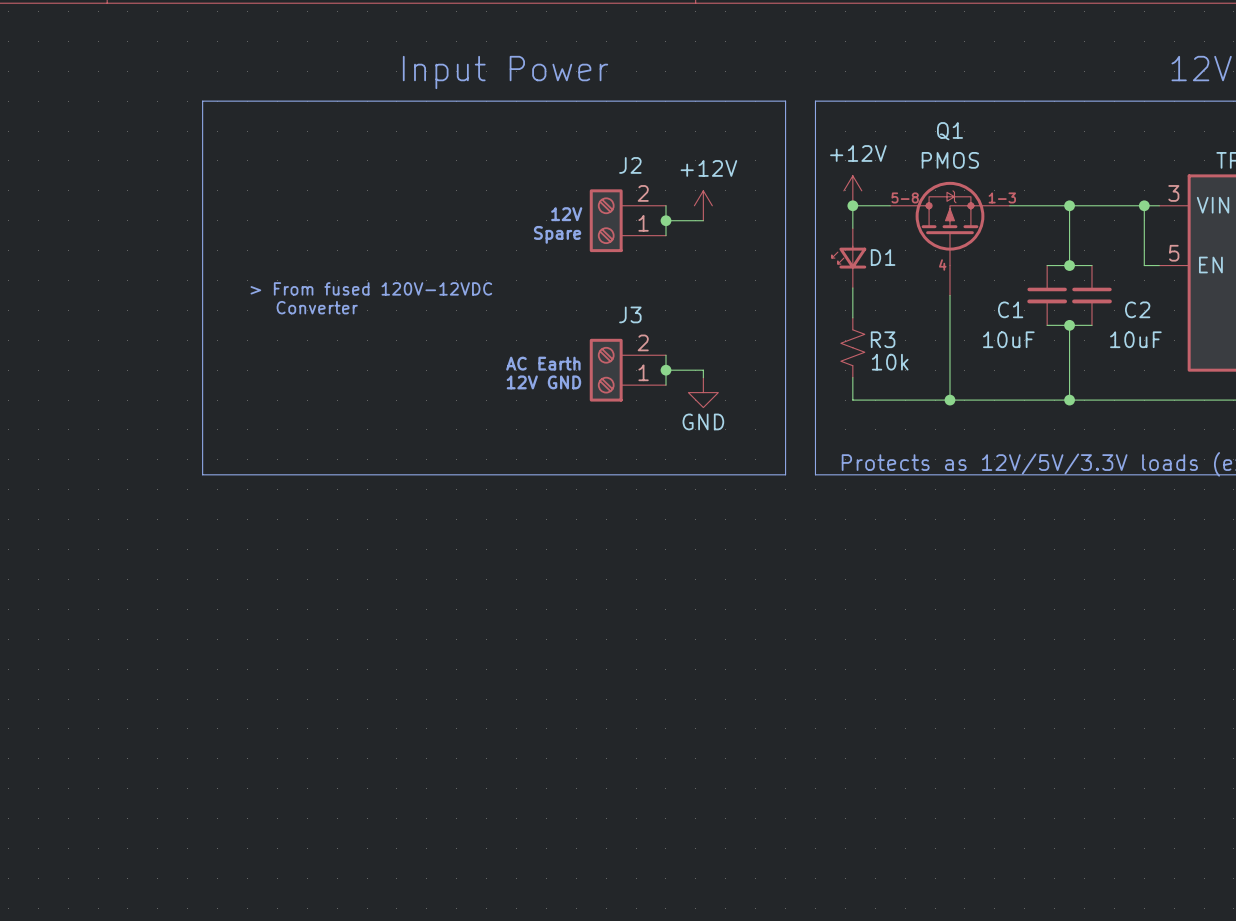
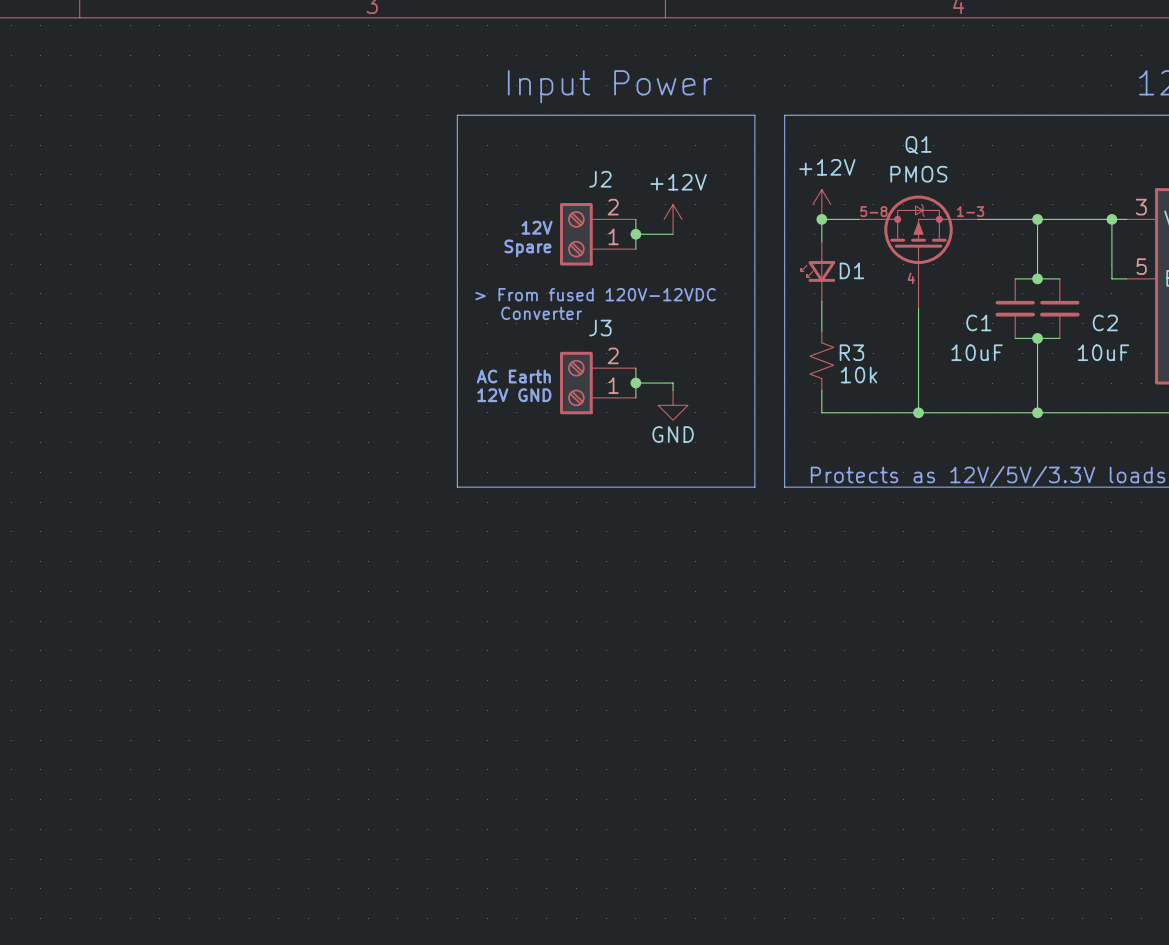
text position: Input Power (505, 72) -> Input Power (610, 86)
line: (486, 101) (202, 101) (202, 474) (486, 474) -> (457, 115) (457, 487)
text position: > From fused 120V-12VDC (371, 288) -> > From fused 120V-12VDC (595, 294)
text position: Converter (317, 307) -> Converter (541, 313)

